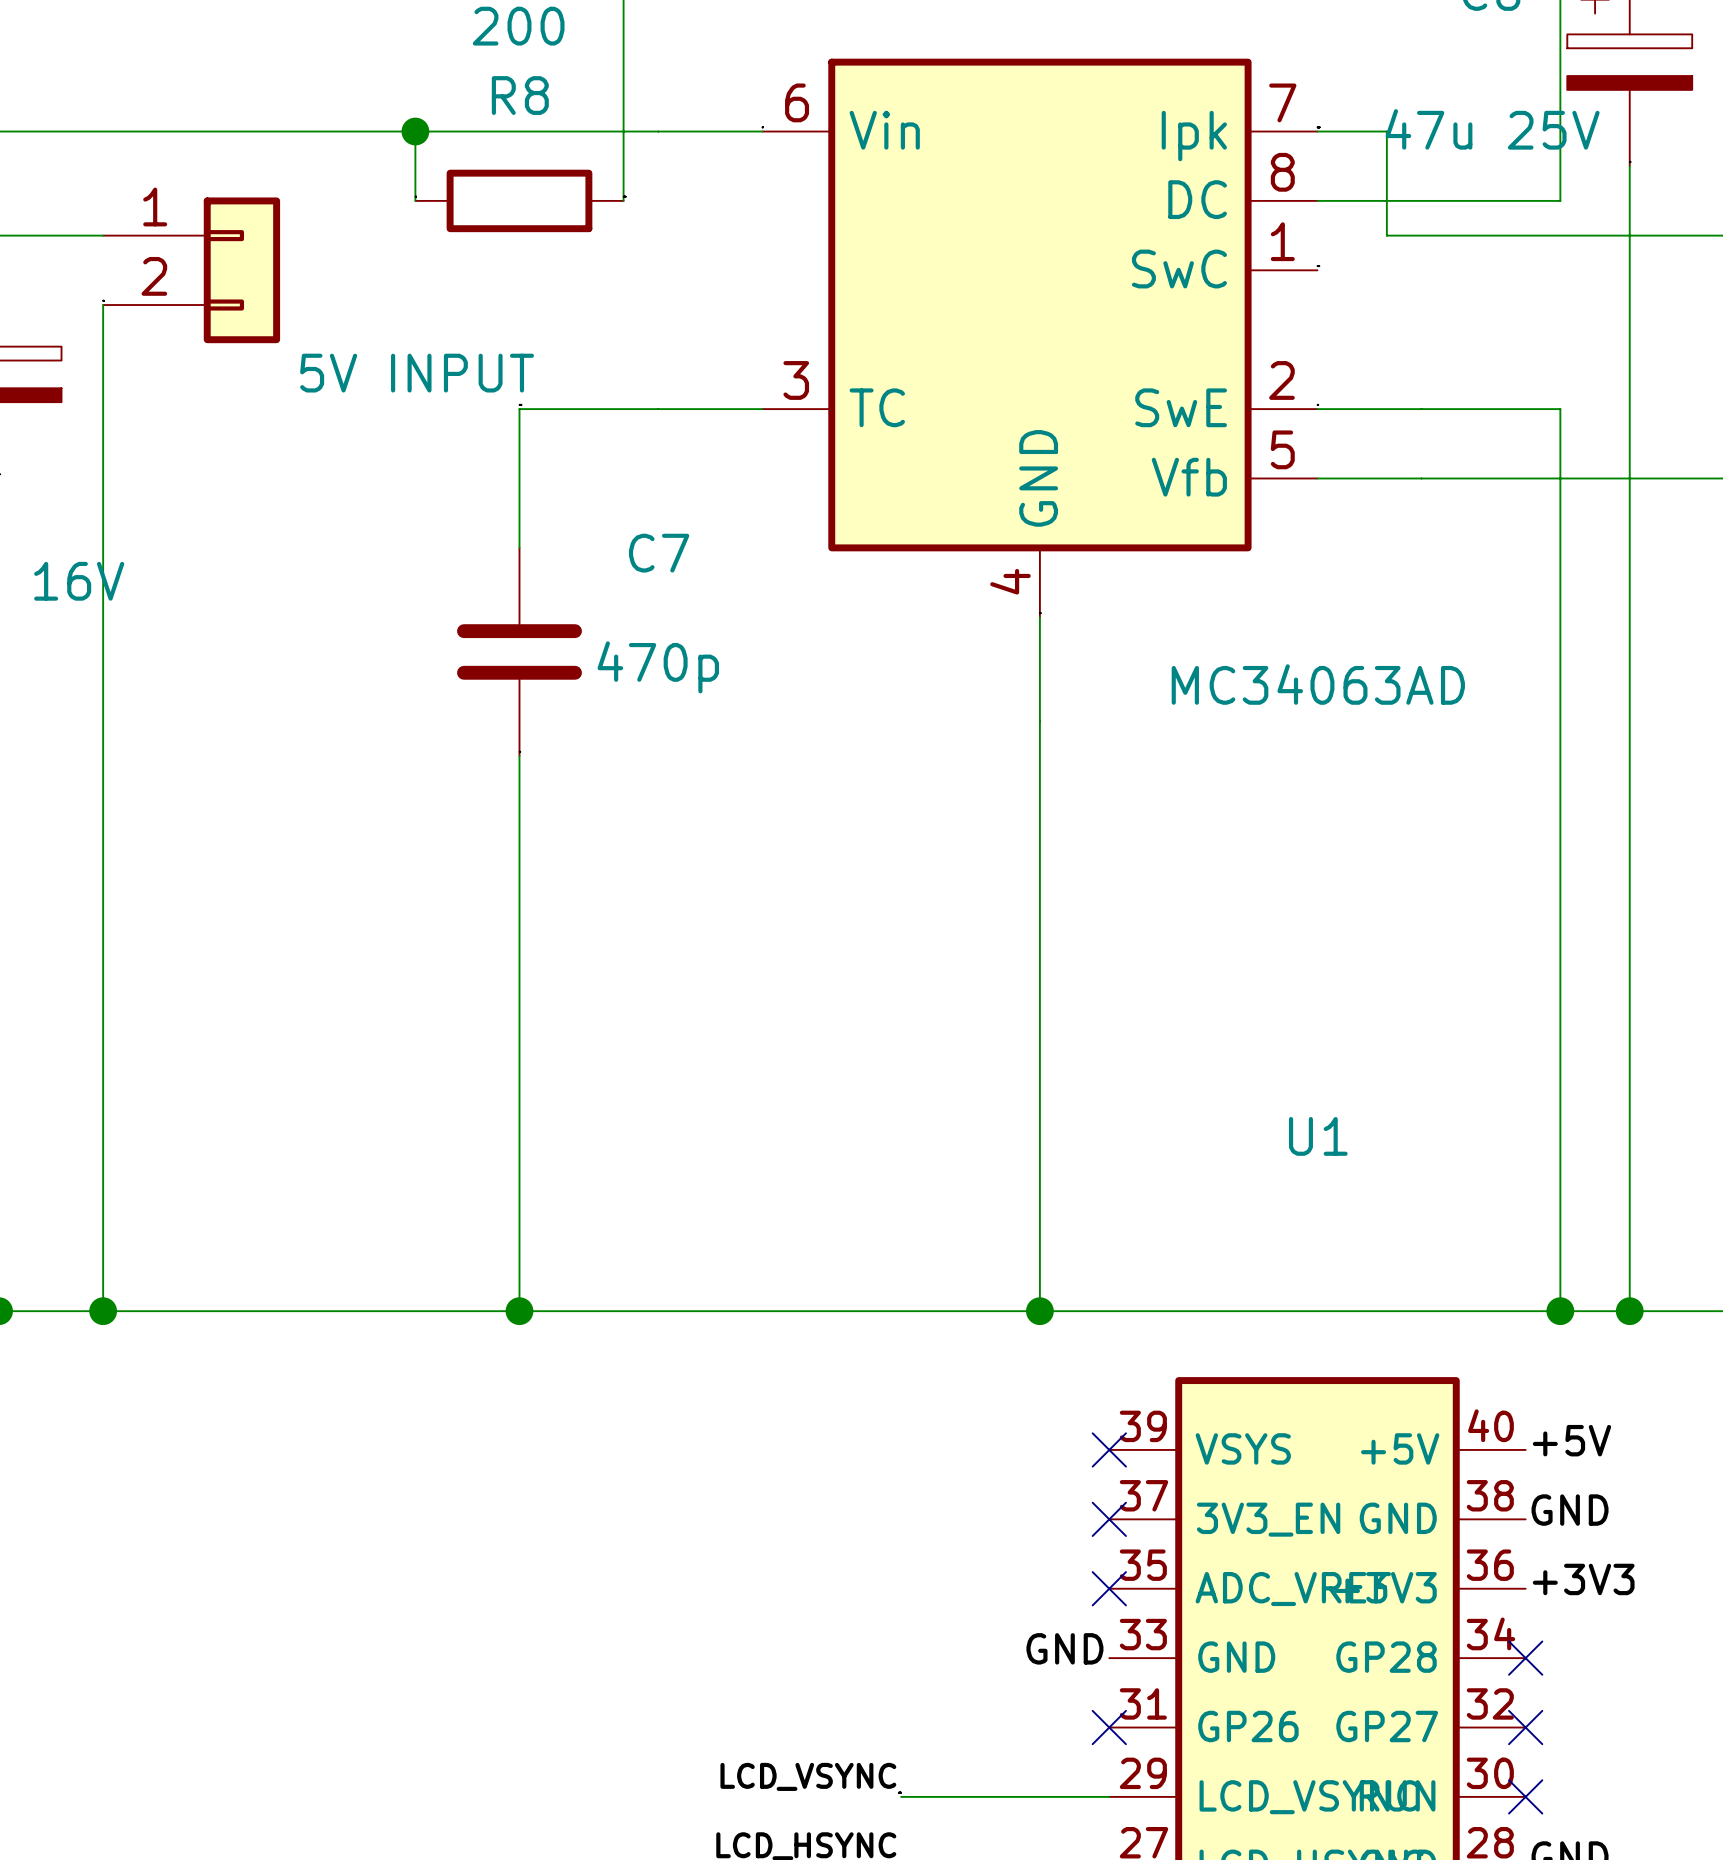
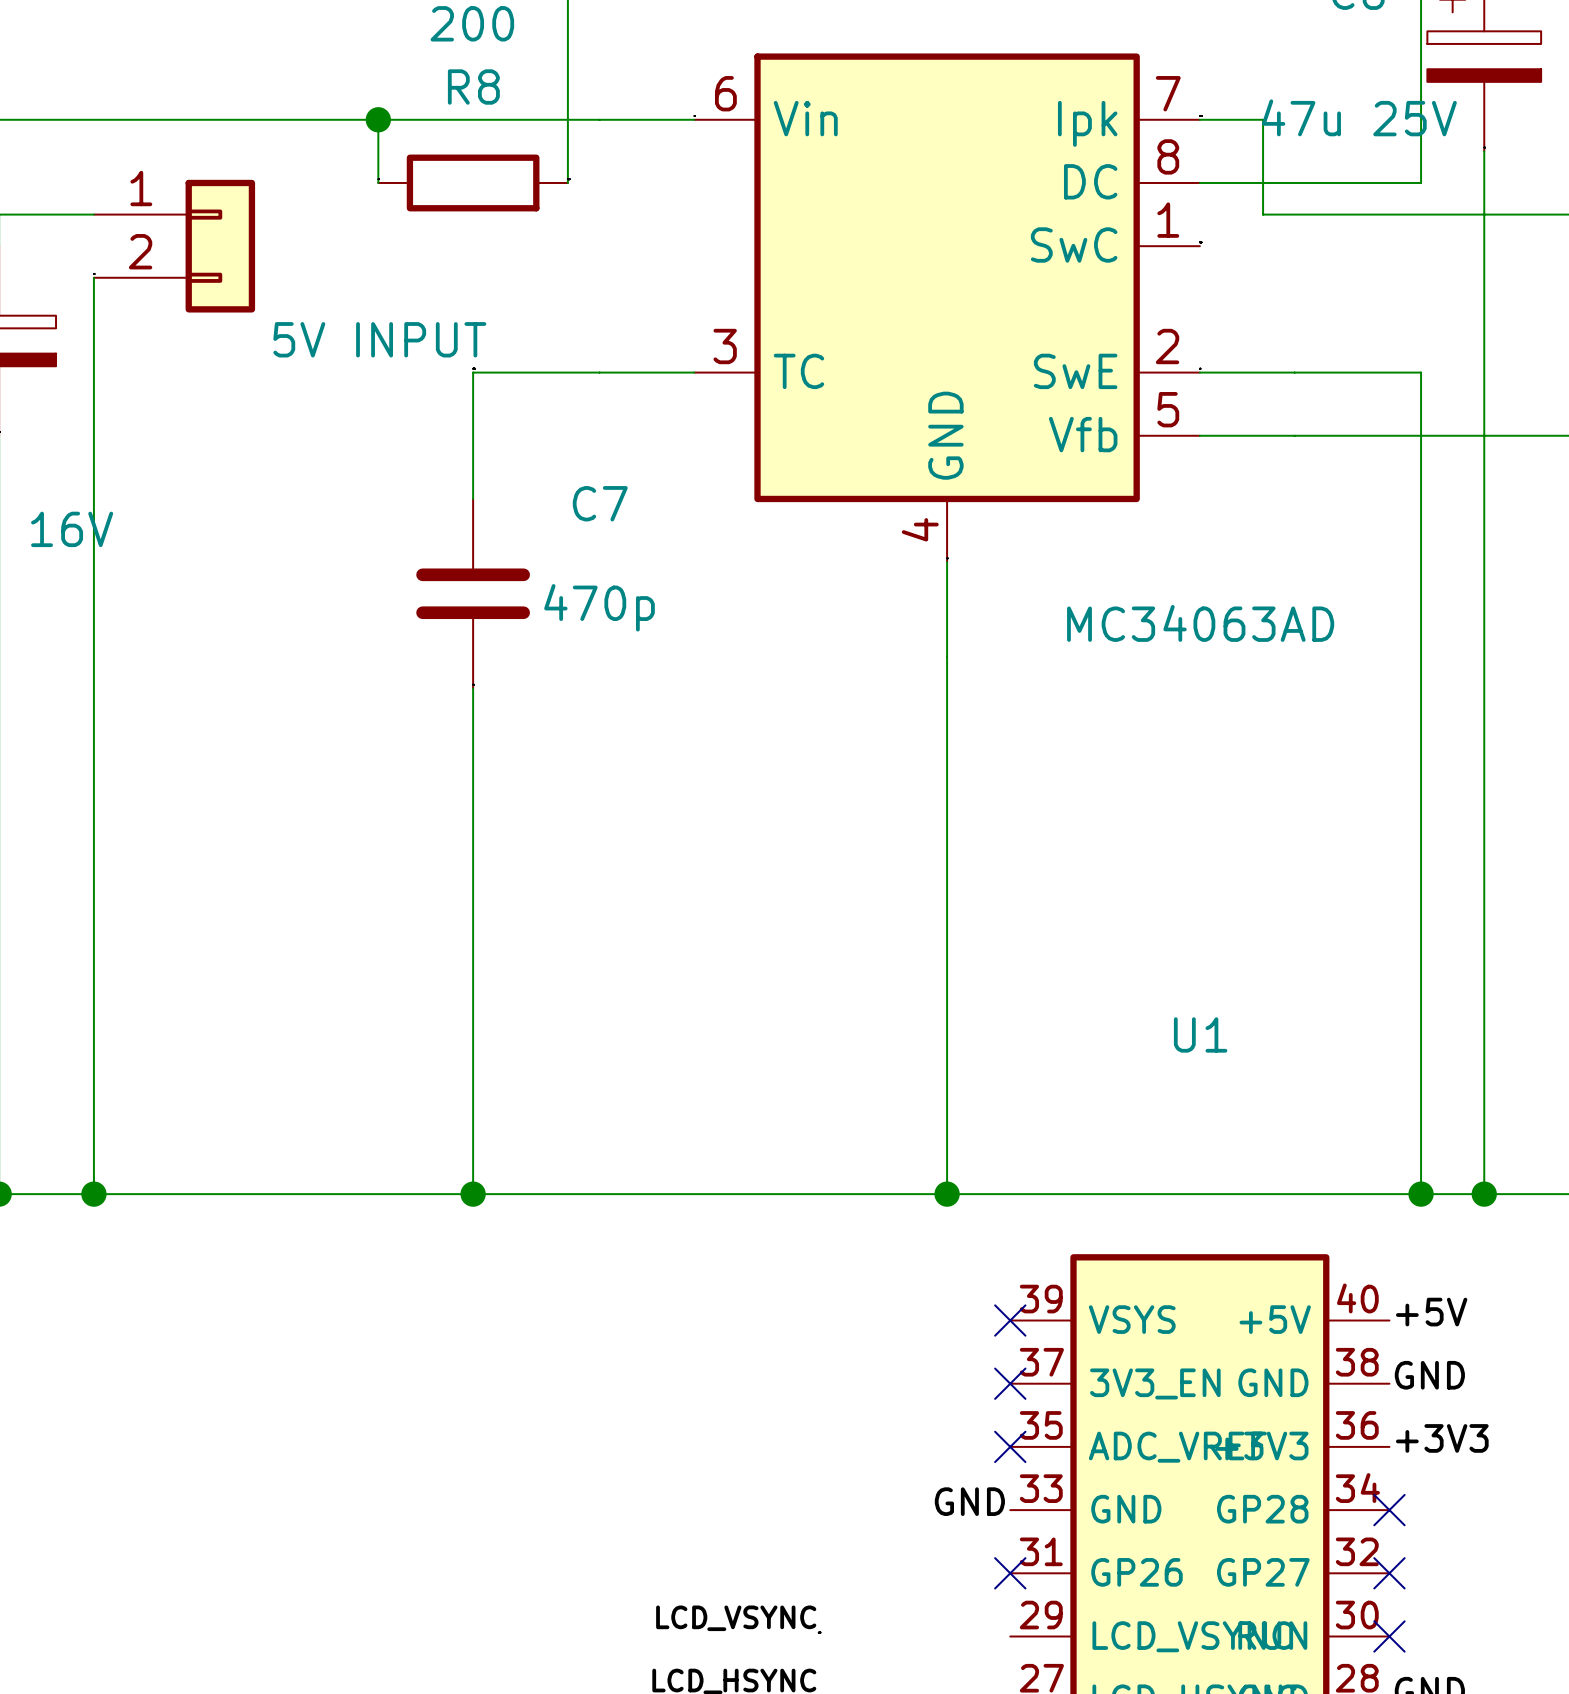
wire: (901, 1796) (1109, 1796) -> none

